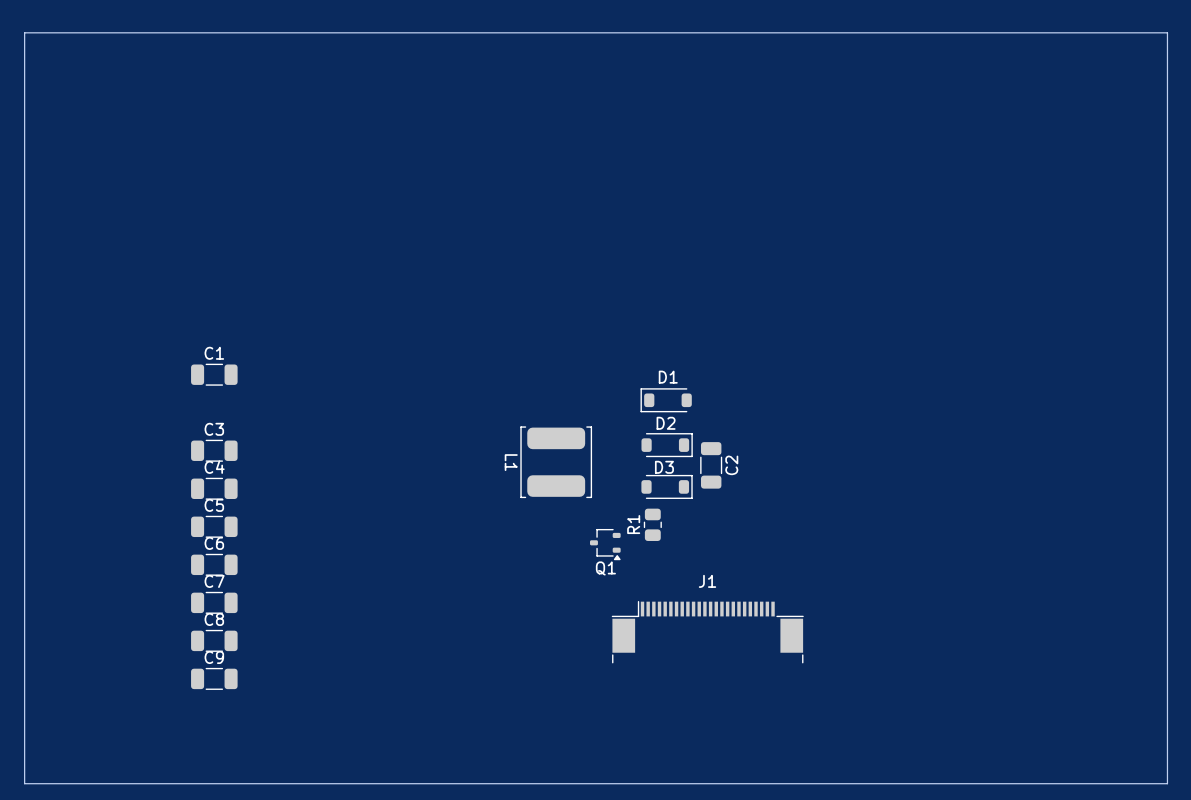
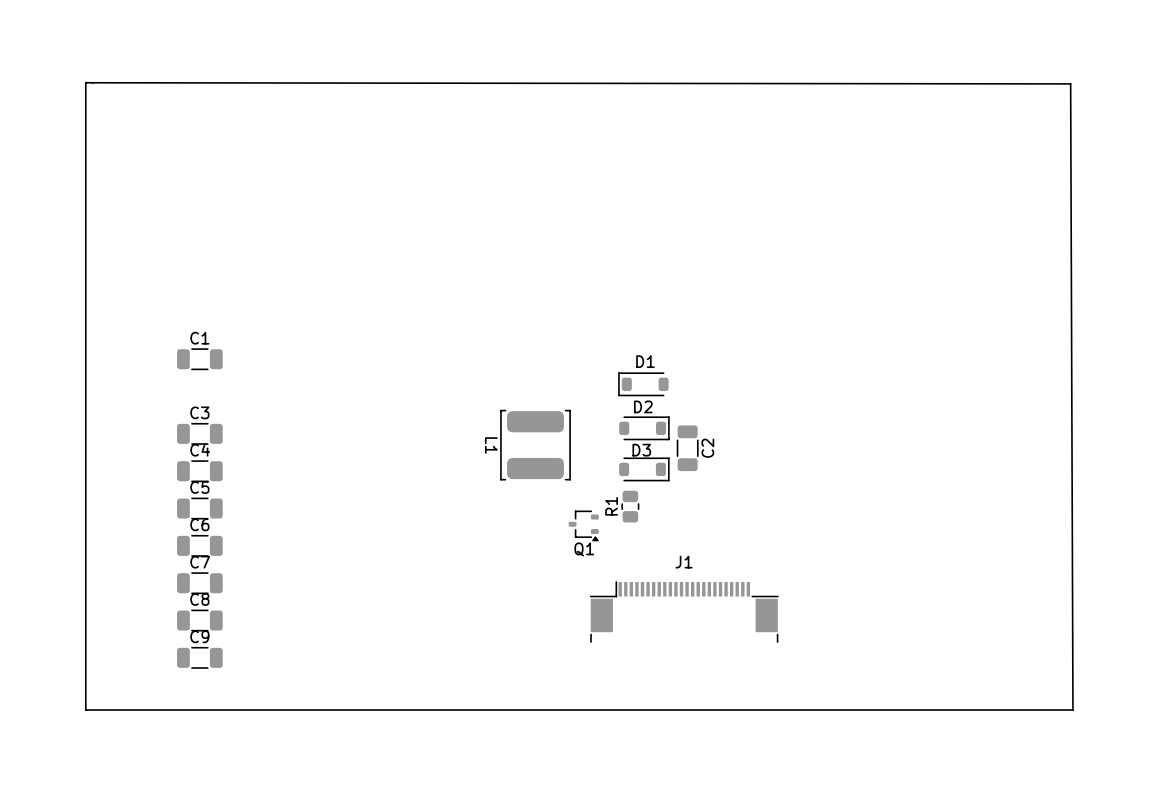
board edge: (24, 32) (1167, 32) (1167, 783) (24, 783) (24, 32) -> (85, 82) (85, 710) (1072, 710) (1070, 83) (85, 82)

